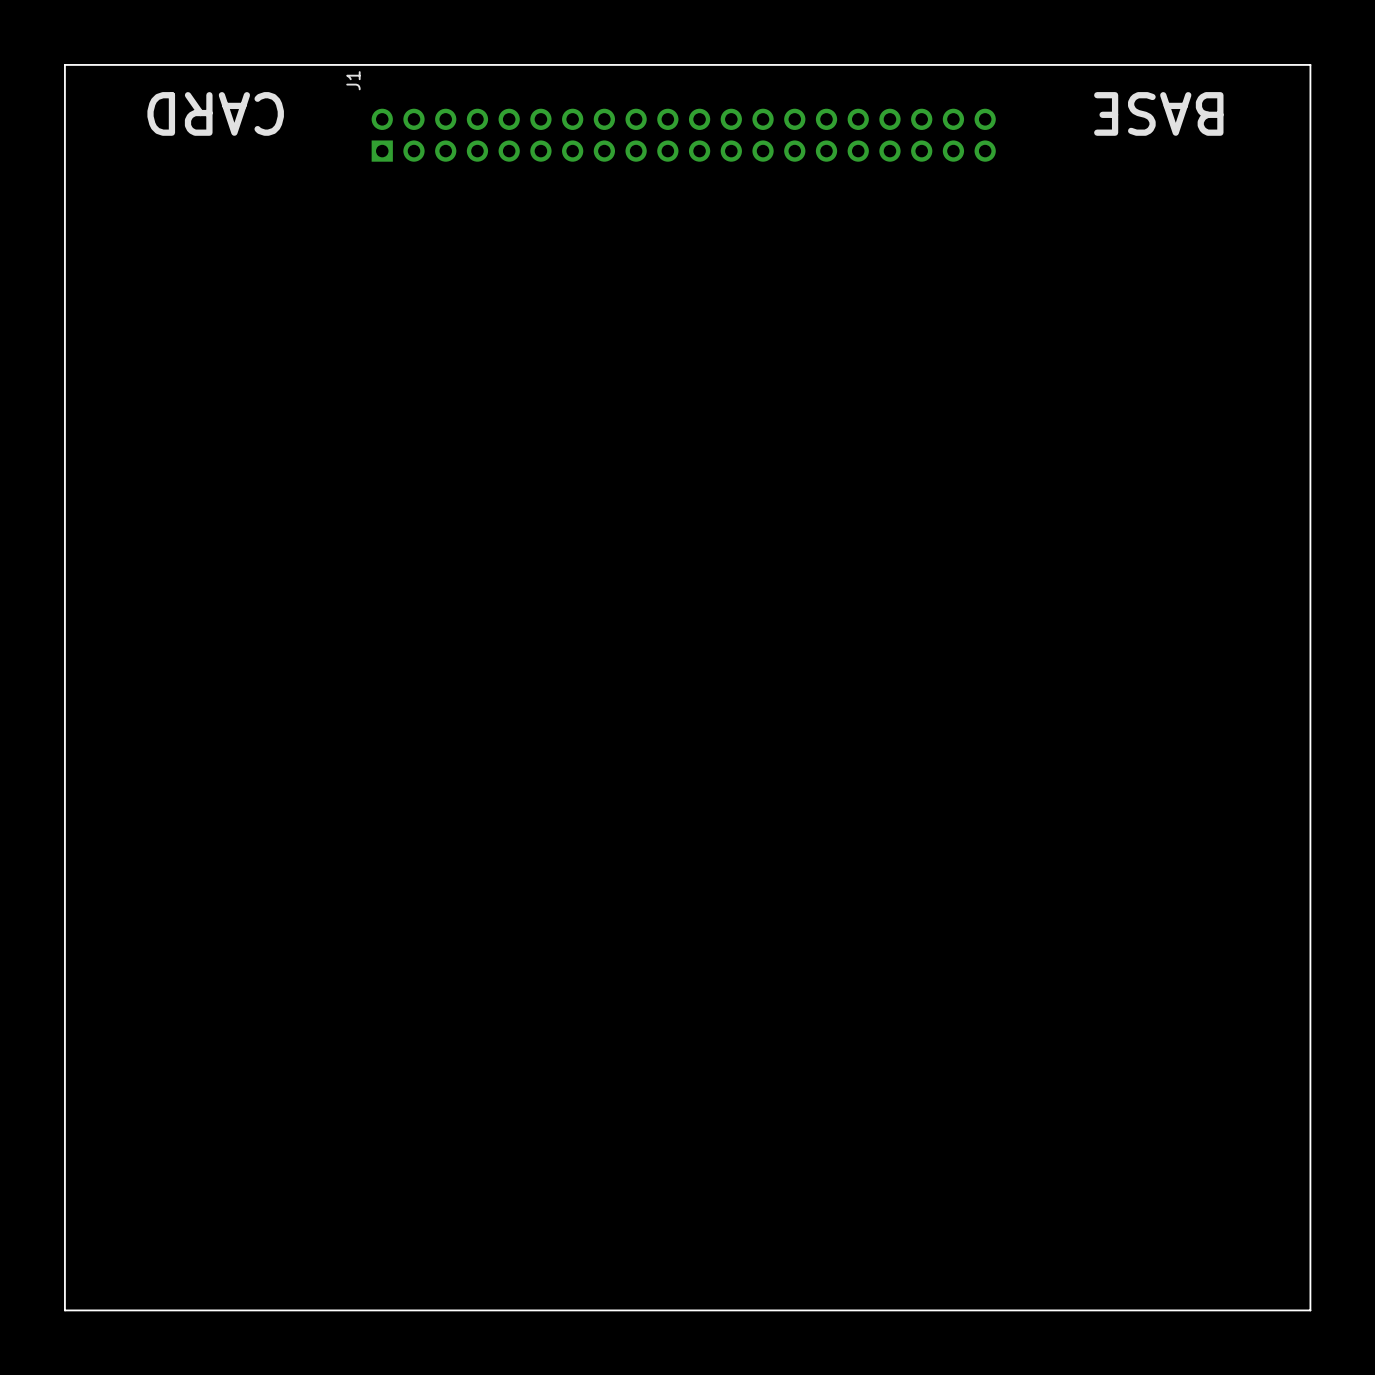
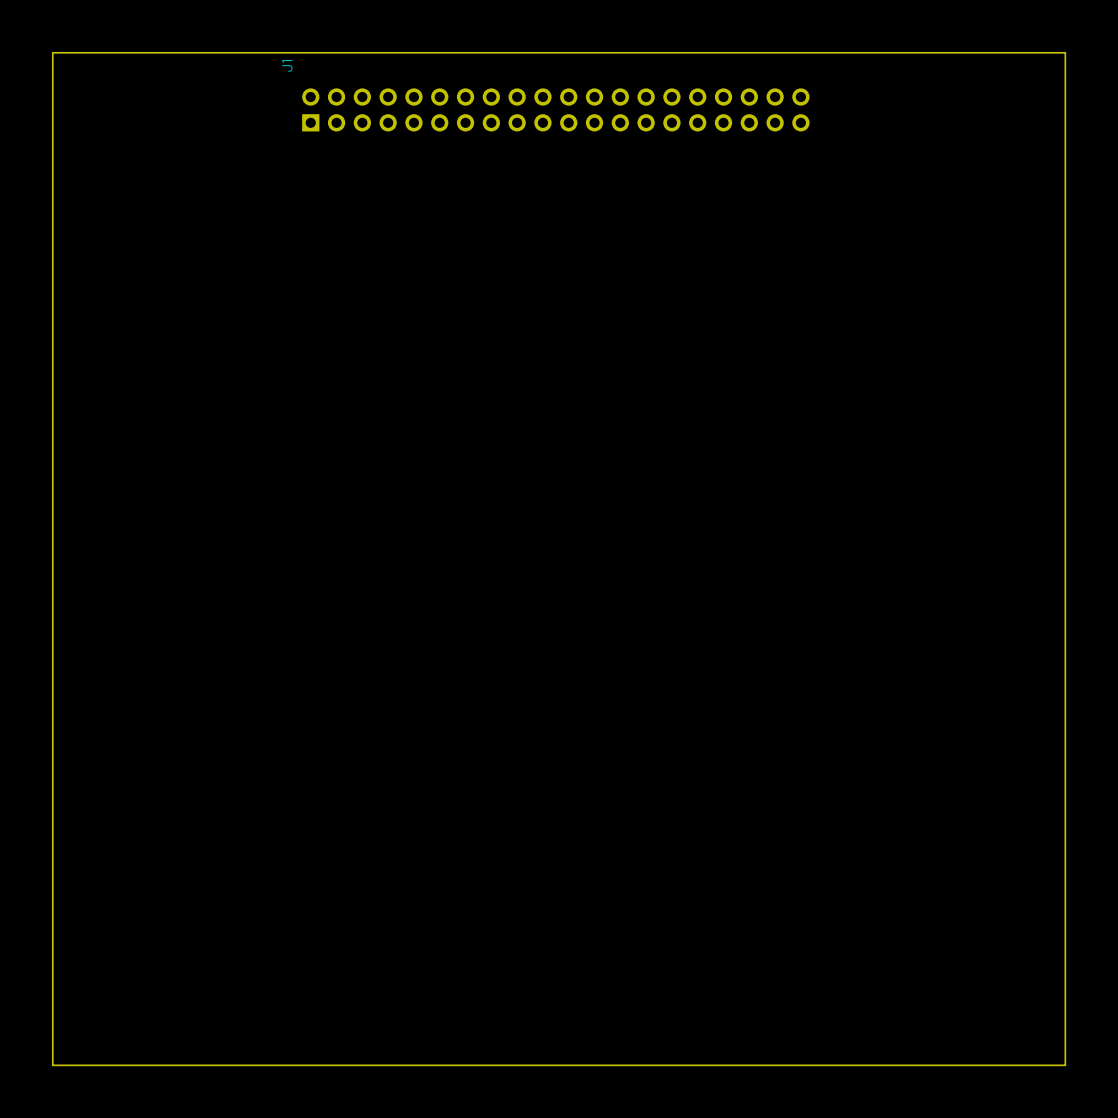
text: CARD (215, 113) -> none
text: BASE (1158, 113) -> none

